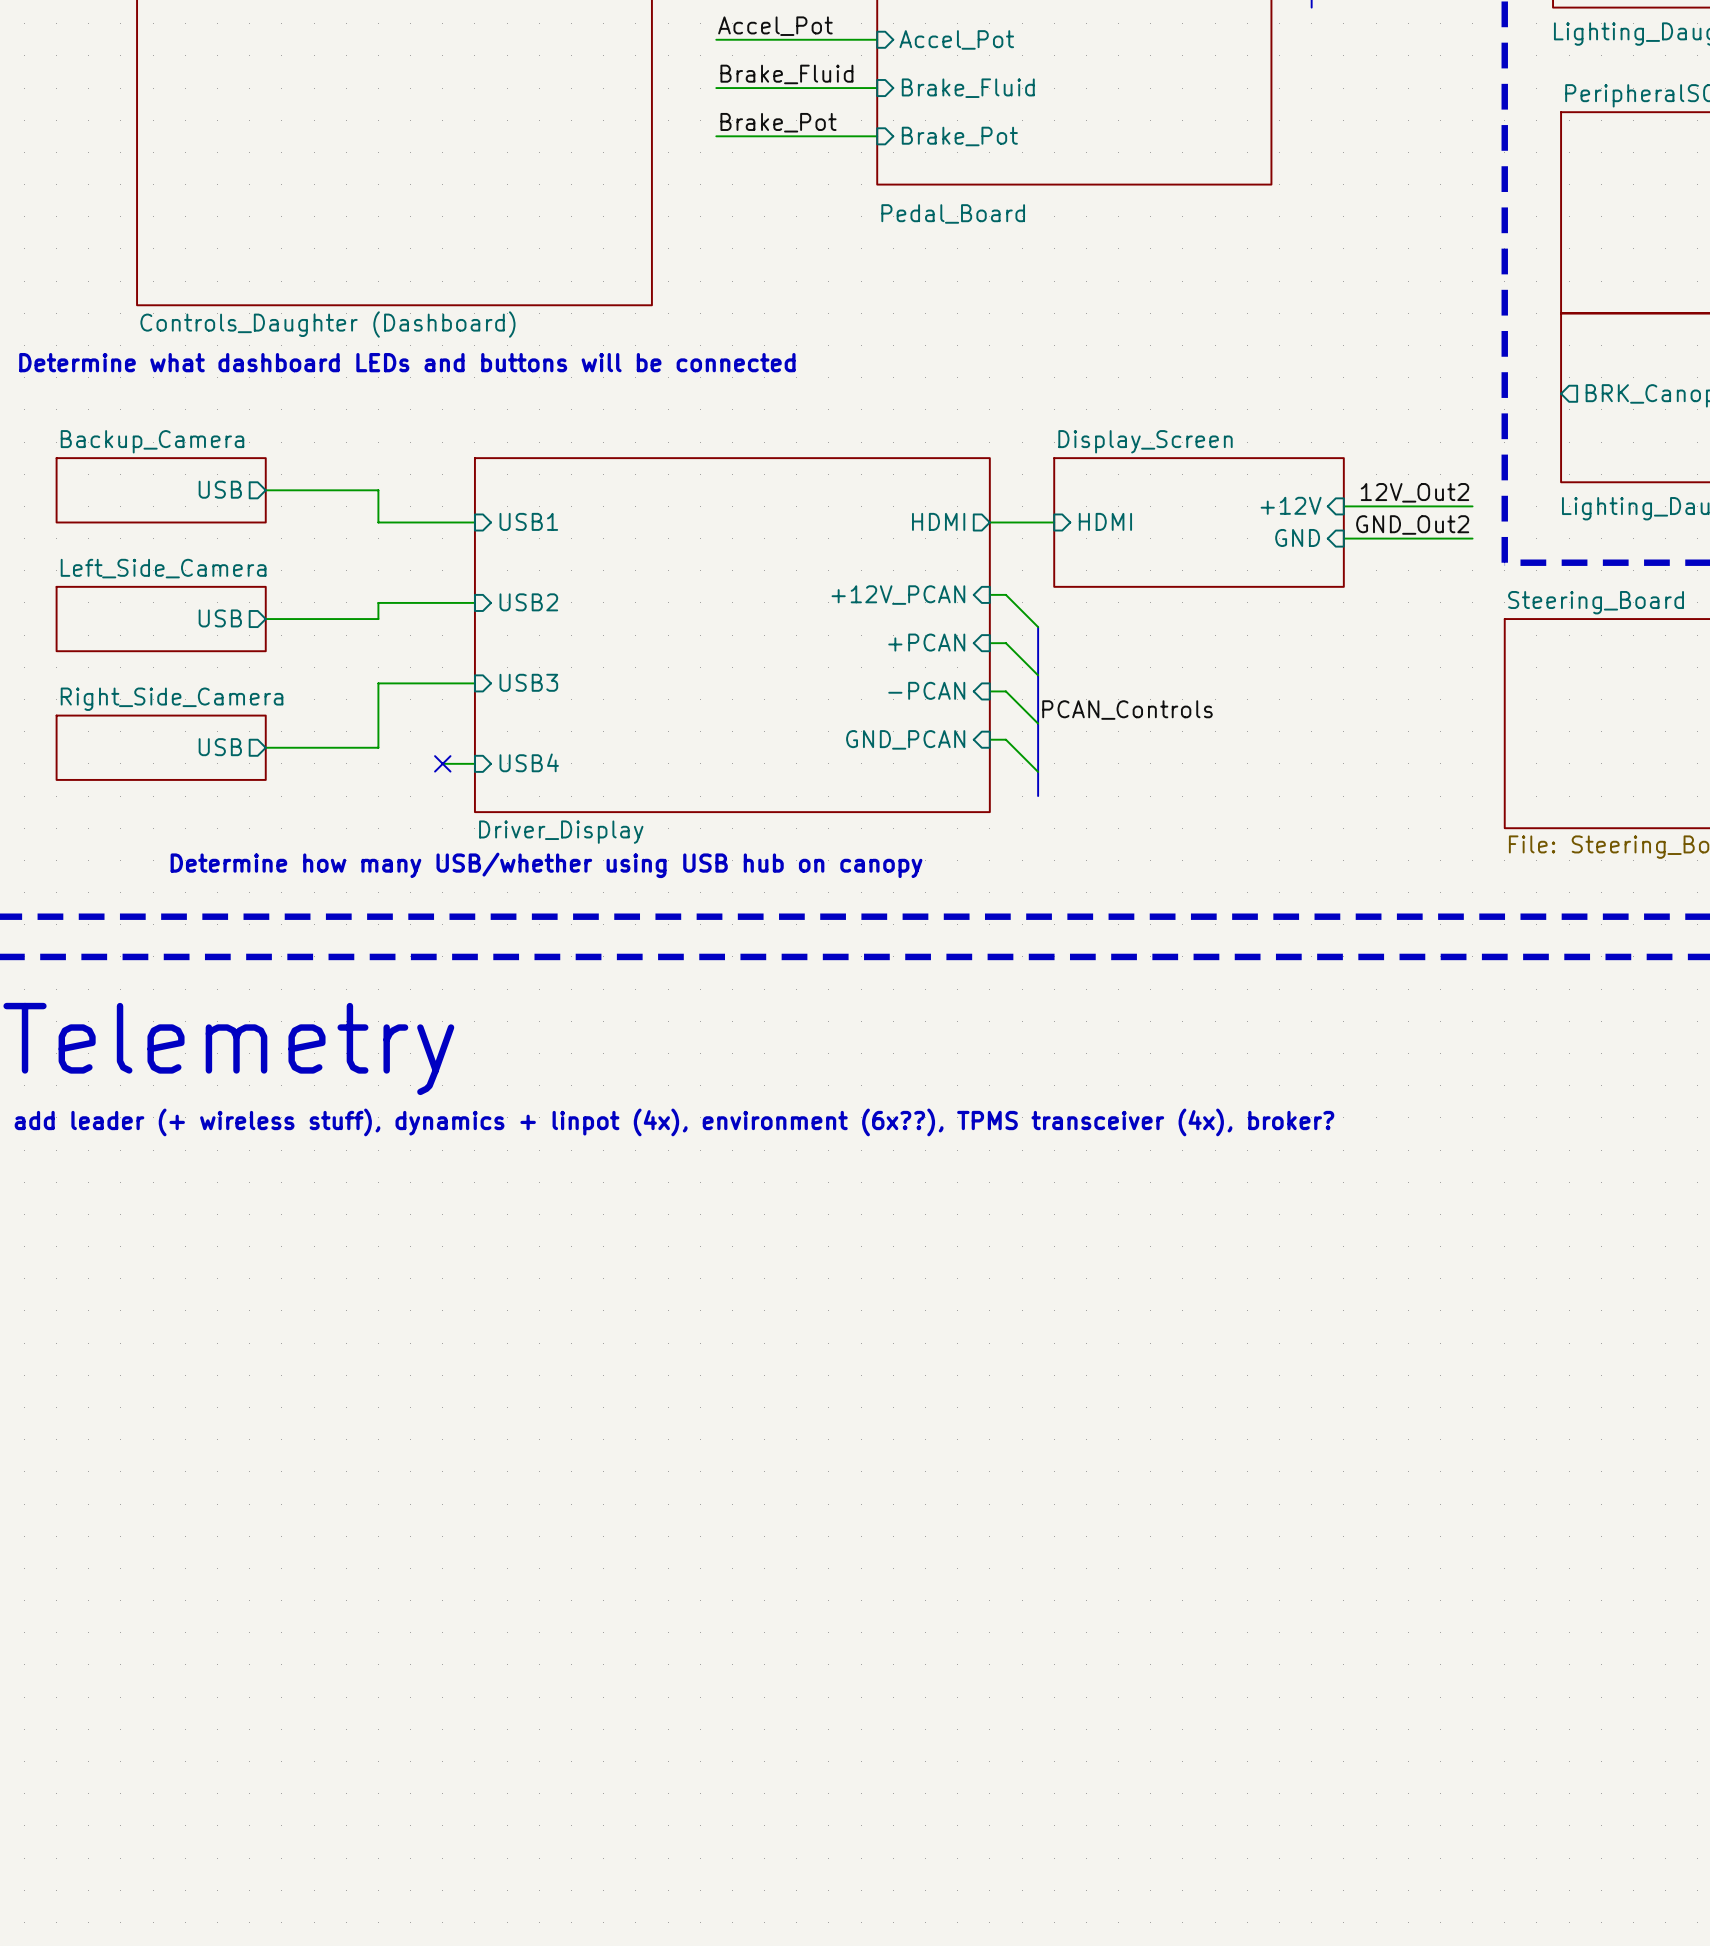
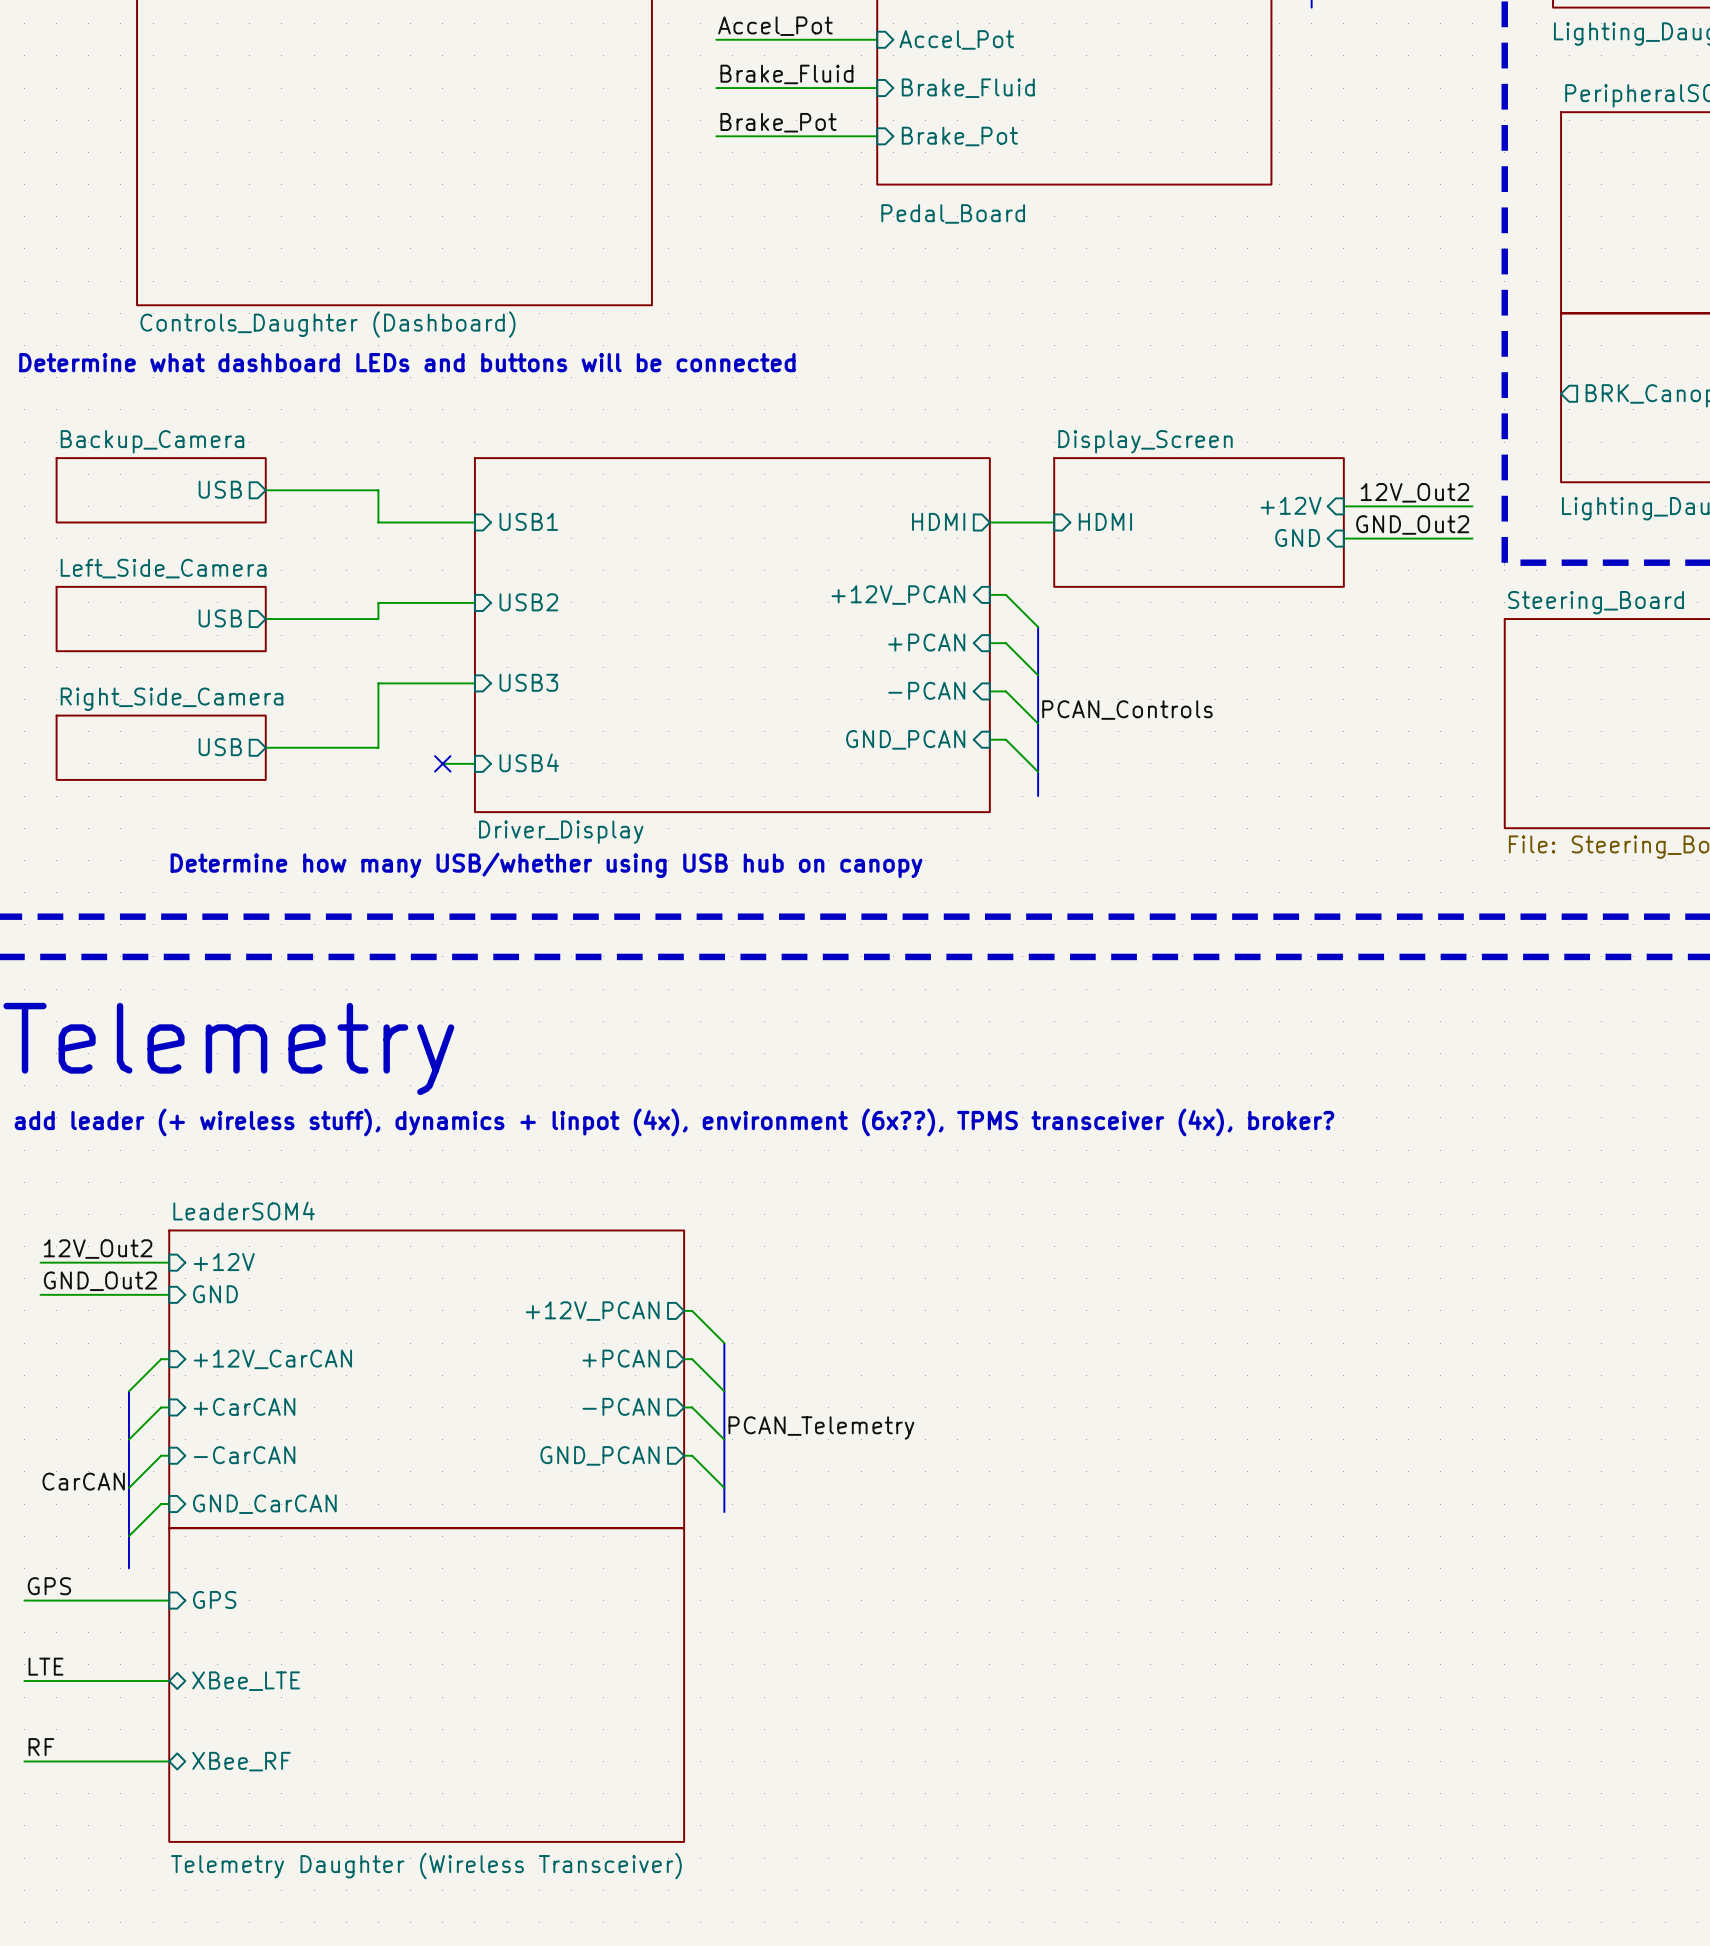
label: none -> 12V_Out2 (98, 1249)
wire: none -> (40, 1262) (169, 1262)
sheet pin: none -> +12V (224, 1262)
label: none -> GND_Out2 (100, 1281)
wire: none -> (40, 1294) (169, 1294)
sheet pin: none -> GND (215, 1294)
wire: none -> (684, 1310) (692, 1310) (724, 1343)
sheet pin: none -> +12V_PCAN (592, 1311)
bus: none -> (724, 1343) (724, 1512)
sheet pin: none -> +PCAN (621, 1358)
wire: none -> (169, 1359) (161, 1359) (129, 1391)
sheet pin: none -> +12V_CarCAN (272, 1359)
wire: none -> (684, 1359) (692, 1359) (724, 1391)
sheet LeaderSOM4: none -> (426, 1379)
bus: none -> (129, 1391) (129, 1568)
sheet pin: none -> +CarCAN (244, 1406)
sheet pin: none -> -PCAN (621, 1406)
wire: none -> (169, 1407) (161, 1407) (129, 1439)
wire: none -> (684, 1407) (692, 1407) (724, 1439)
label: none -> PCAN_Telemetry (821, 1427)
wire: none -> (169, 1455) (161, 1455) (129, 1487)
sheet pin: none -> -CarCAN (244, 1455)
sheet pin: none -> GND_PCAN (599, 1455)
wire: none -> (684, 1455) (692, 1455) (724, 1487)
label: none -> CarCAN (83, 1481)
wire: none -> (169, 1504) (161, 1504) (129, 1536)
sheet pin: none -> GND_CarCAN (264, 1504)
label: none -> GPS (49, 1586)
sheet pin: none -> GPS (214, 1599)
wire: none -> (24, 1600) (169, 1600)
label: none -> LTE (45, 1666)
wire: none -> (24, 1681) (169, 1681)
sheet pin: none -> XBee_LTE (246, 1681)
sheet Telemetry Daughter (Wireless Transceiver): none -> (426, 1685)
label: none -> RF (41, 1747)
wire: none -> (24, 1761) (169, 1761)
sheet pin: none -> XBee_RF (241, 1761)

